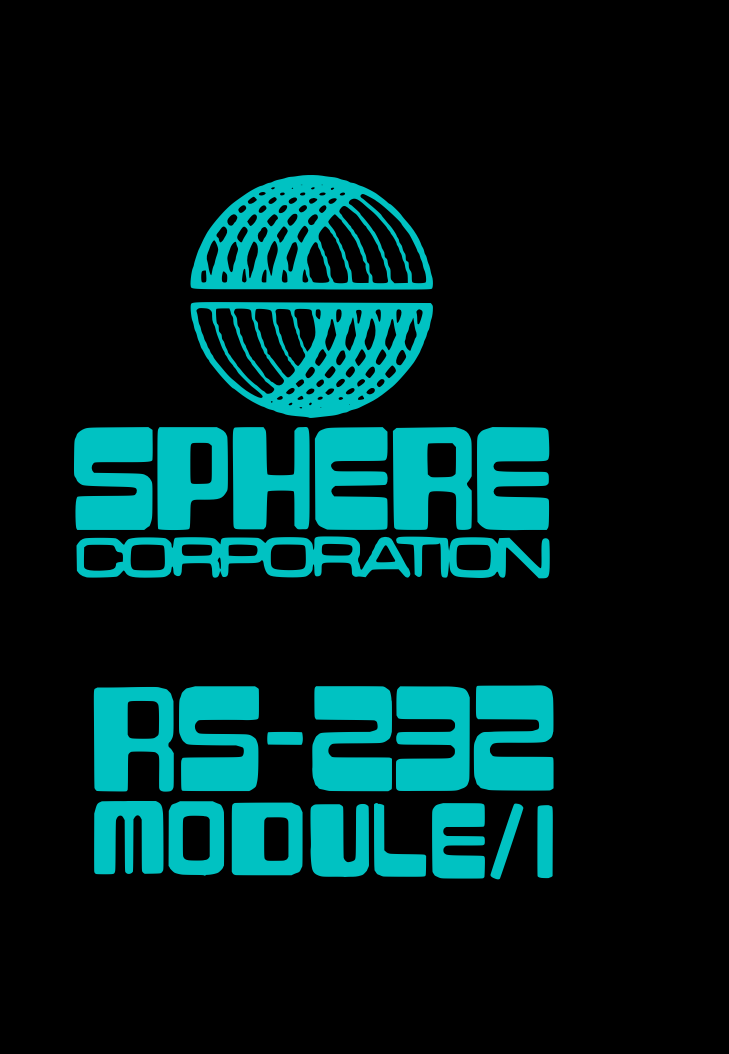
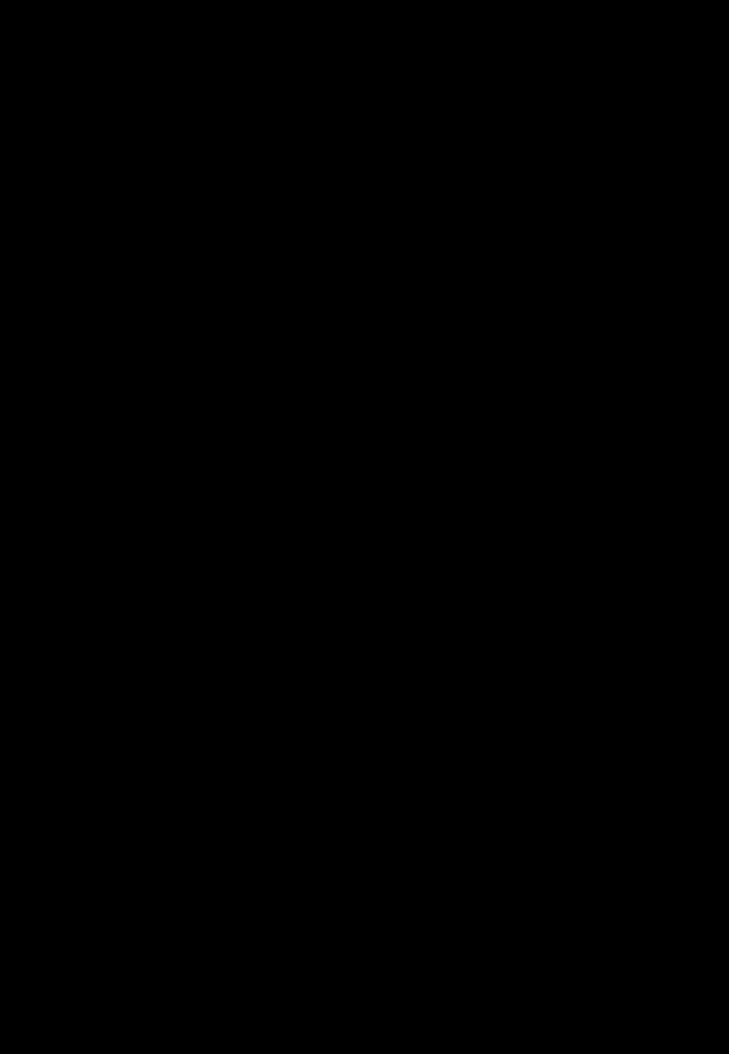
drawing: [73, 175, 550, 579] -> none
drawing: [93, 685, 554, 880] -> none

